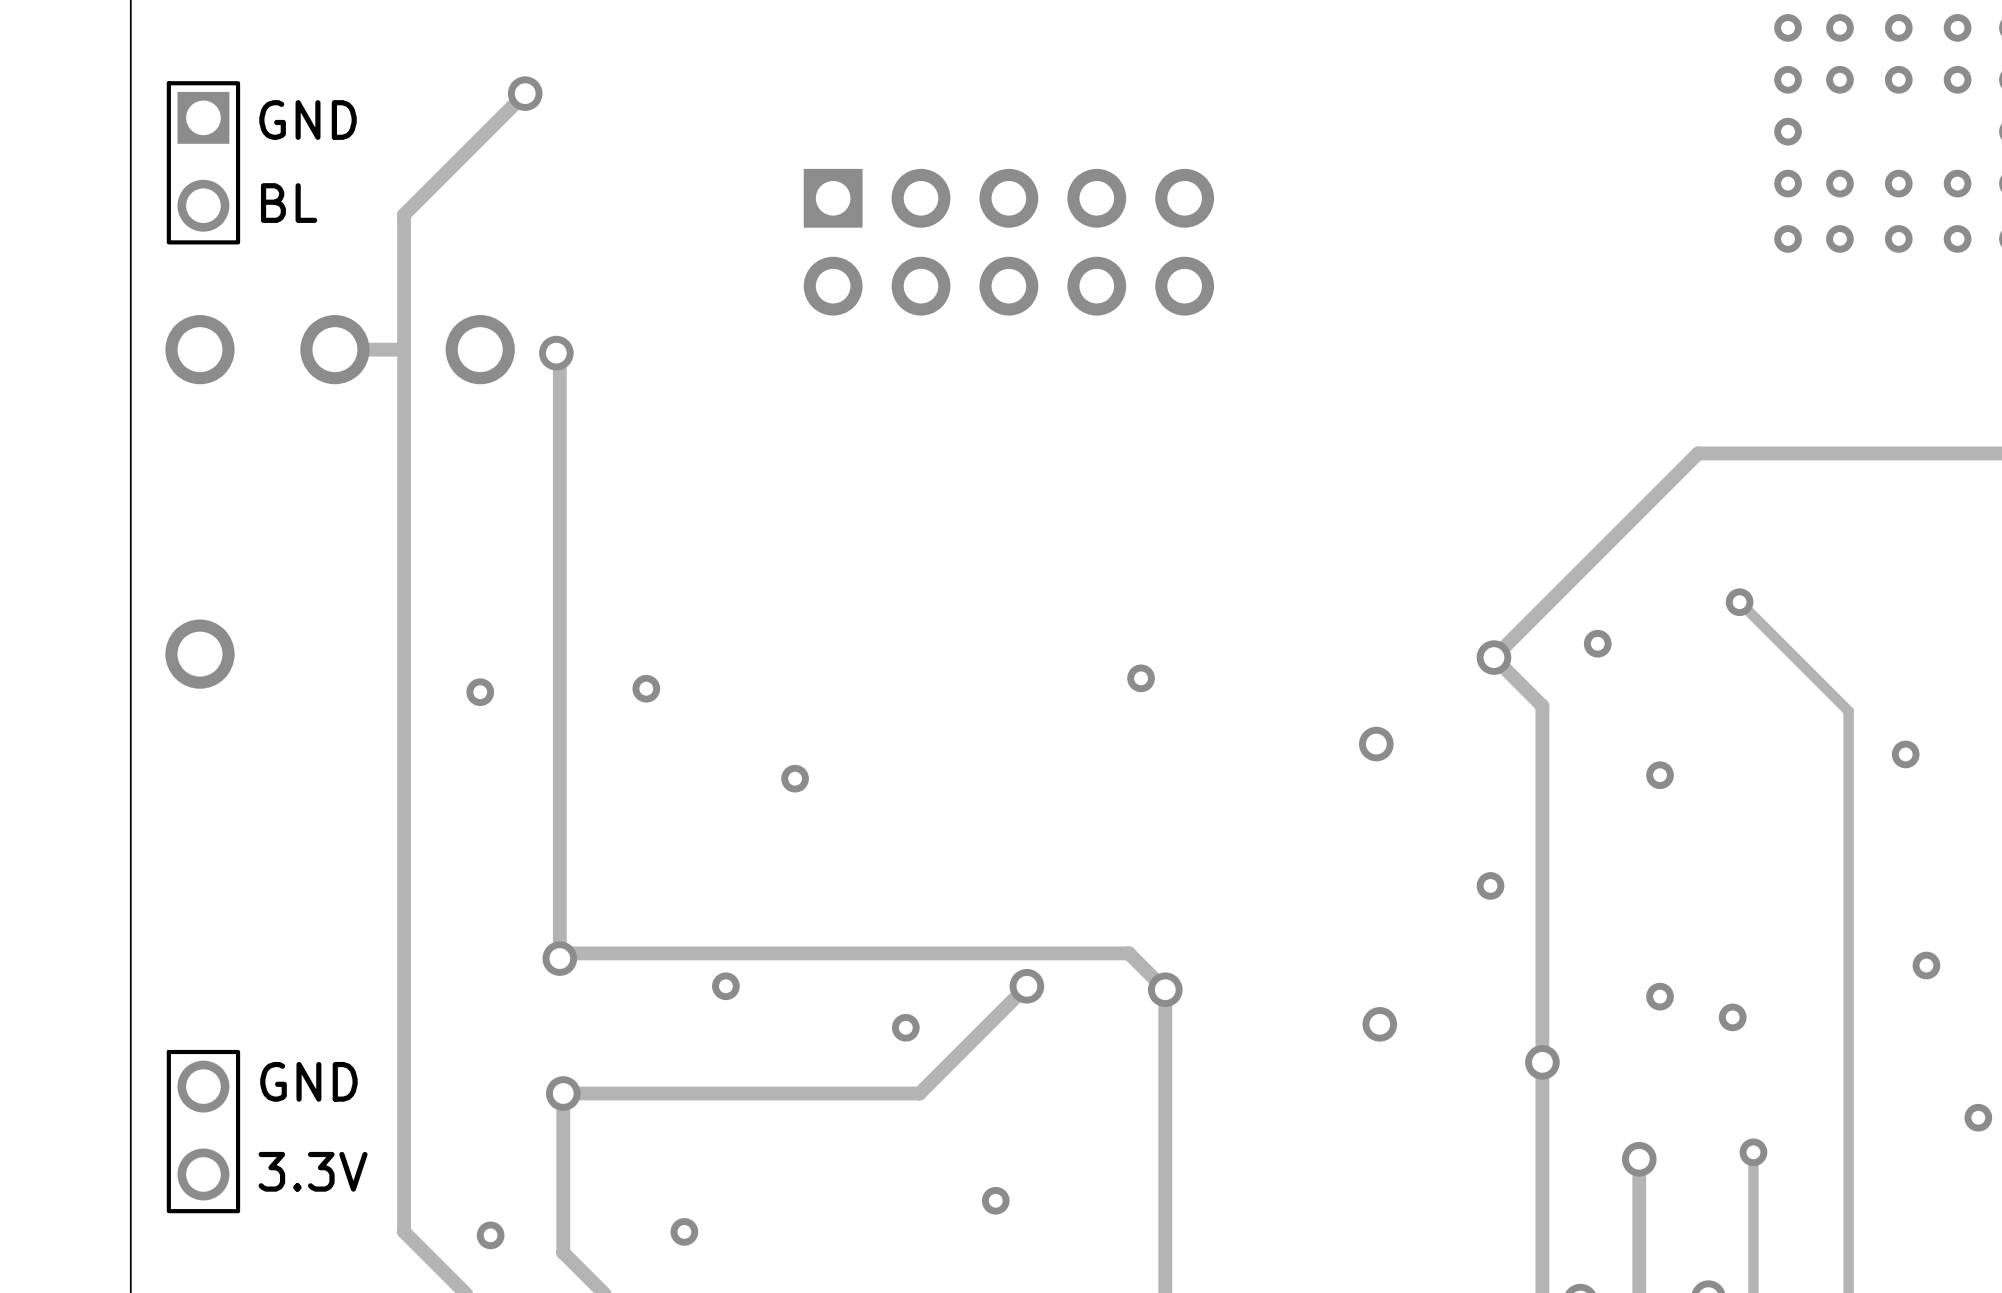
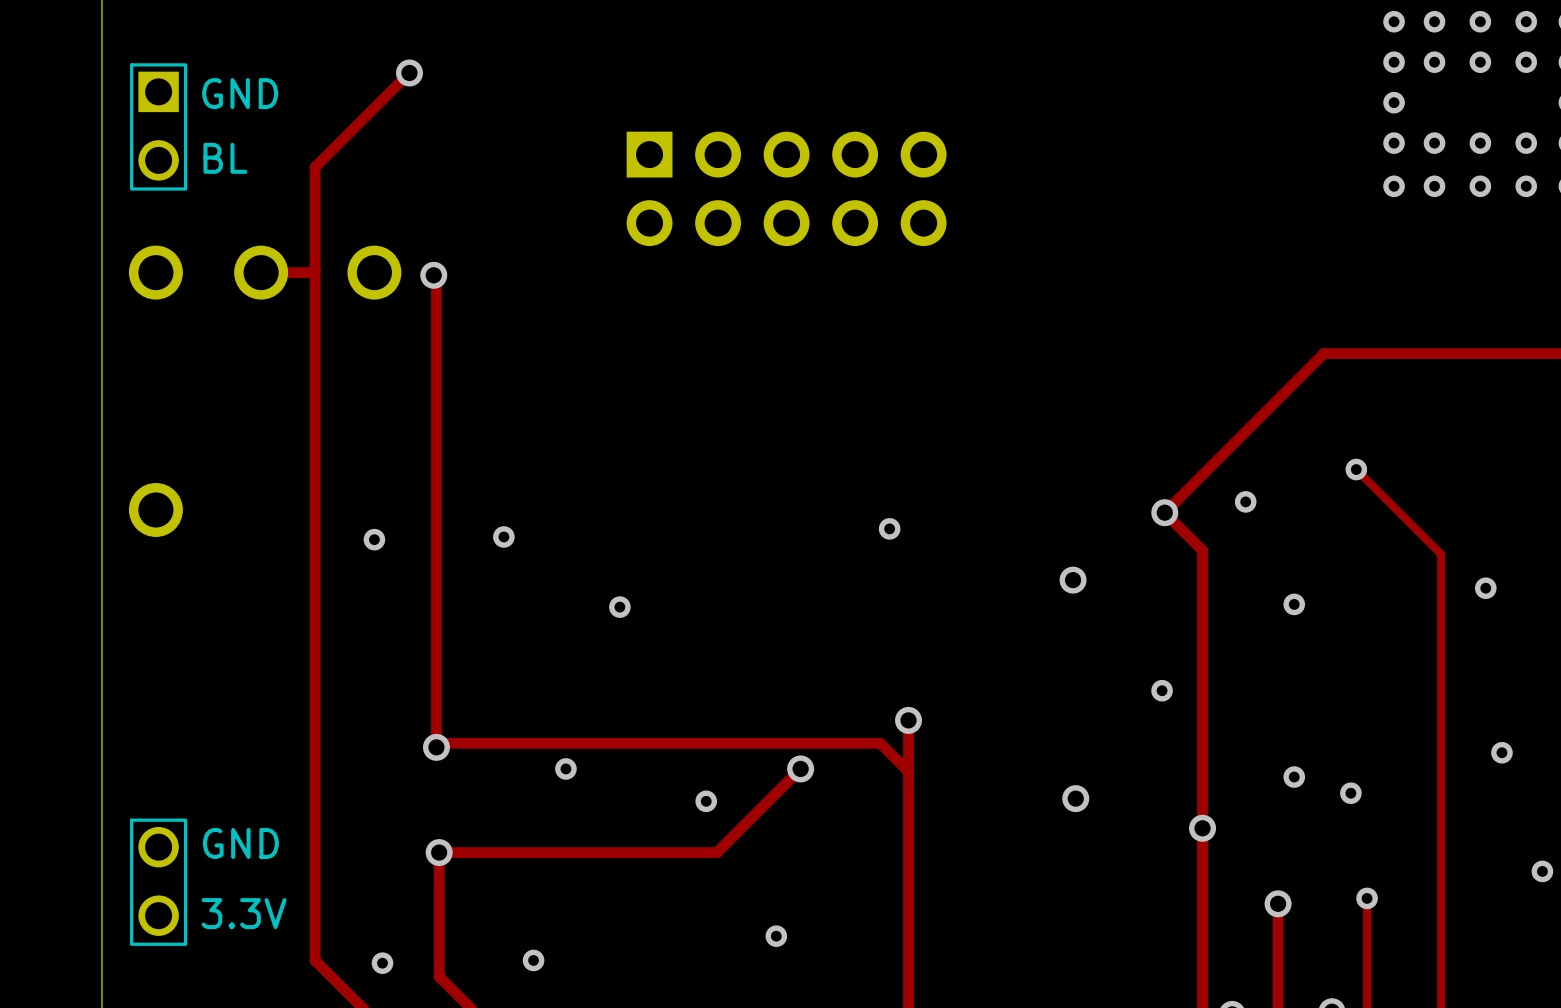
track: none -> (908, 720) (908, 771)
via position: (1165, 989) -> (908, 720)

